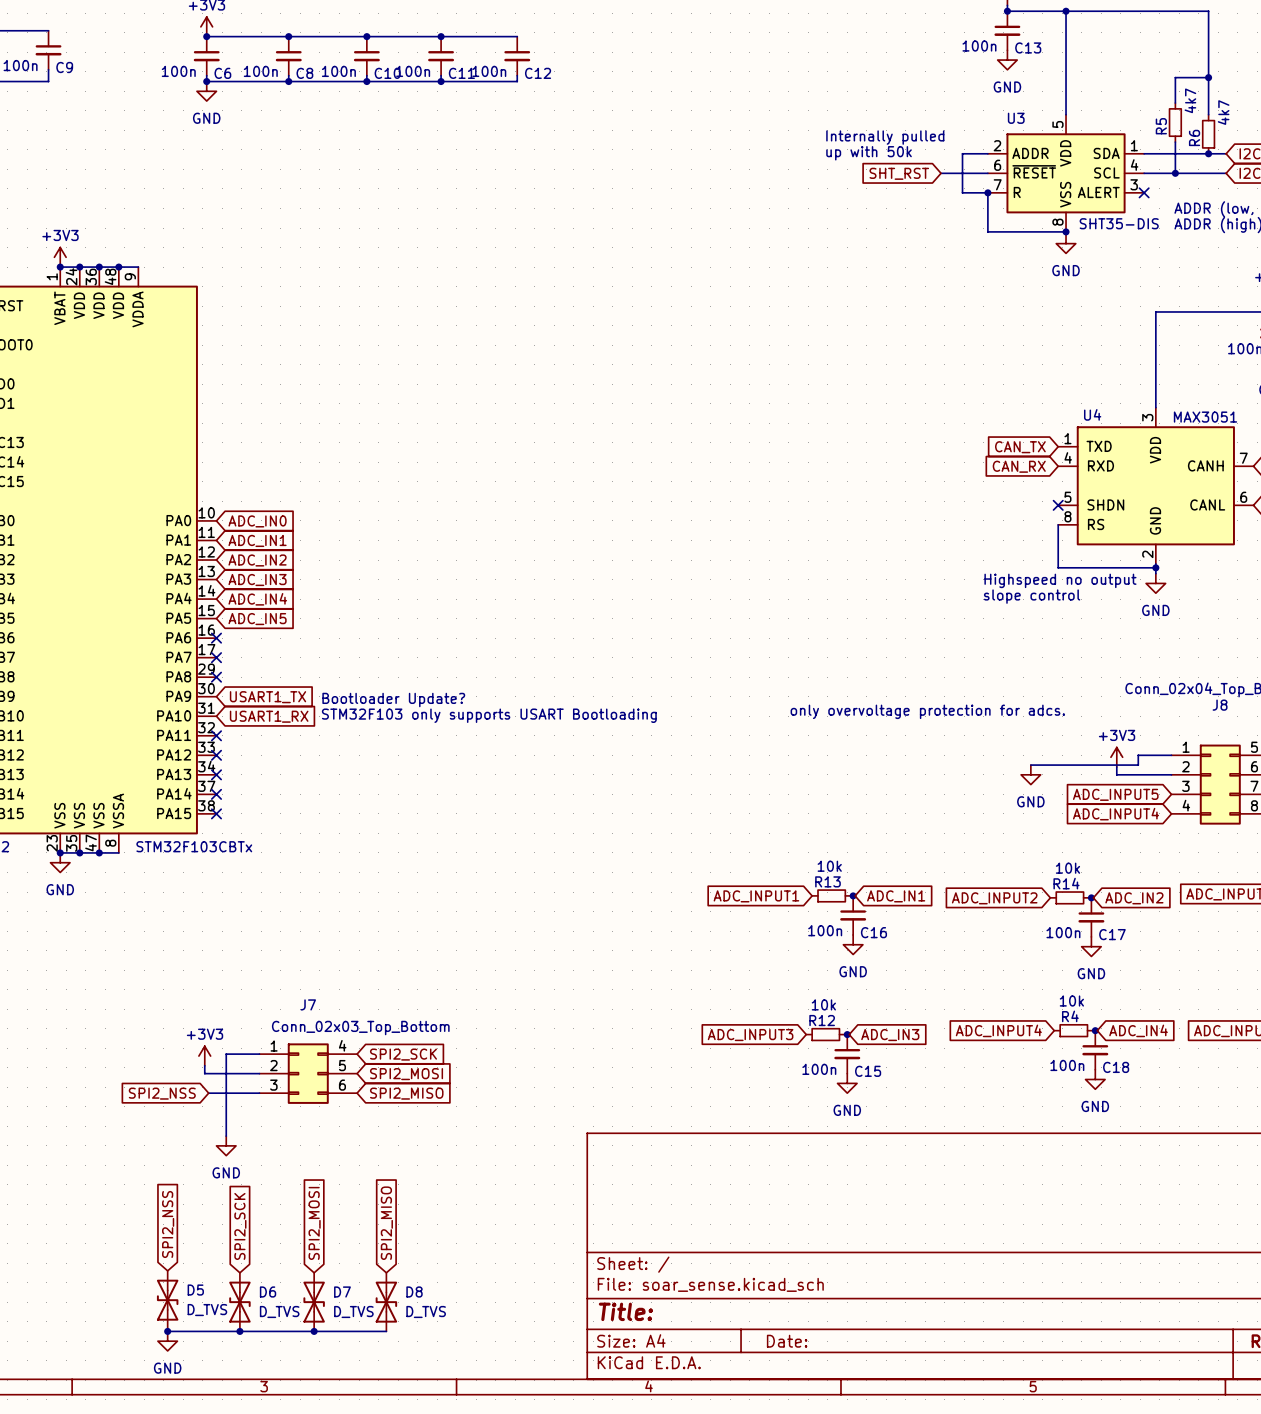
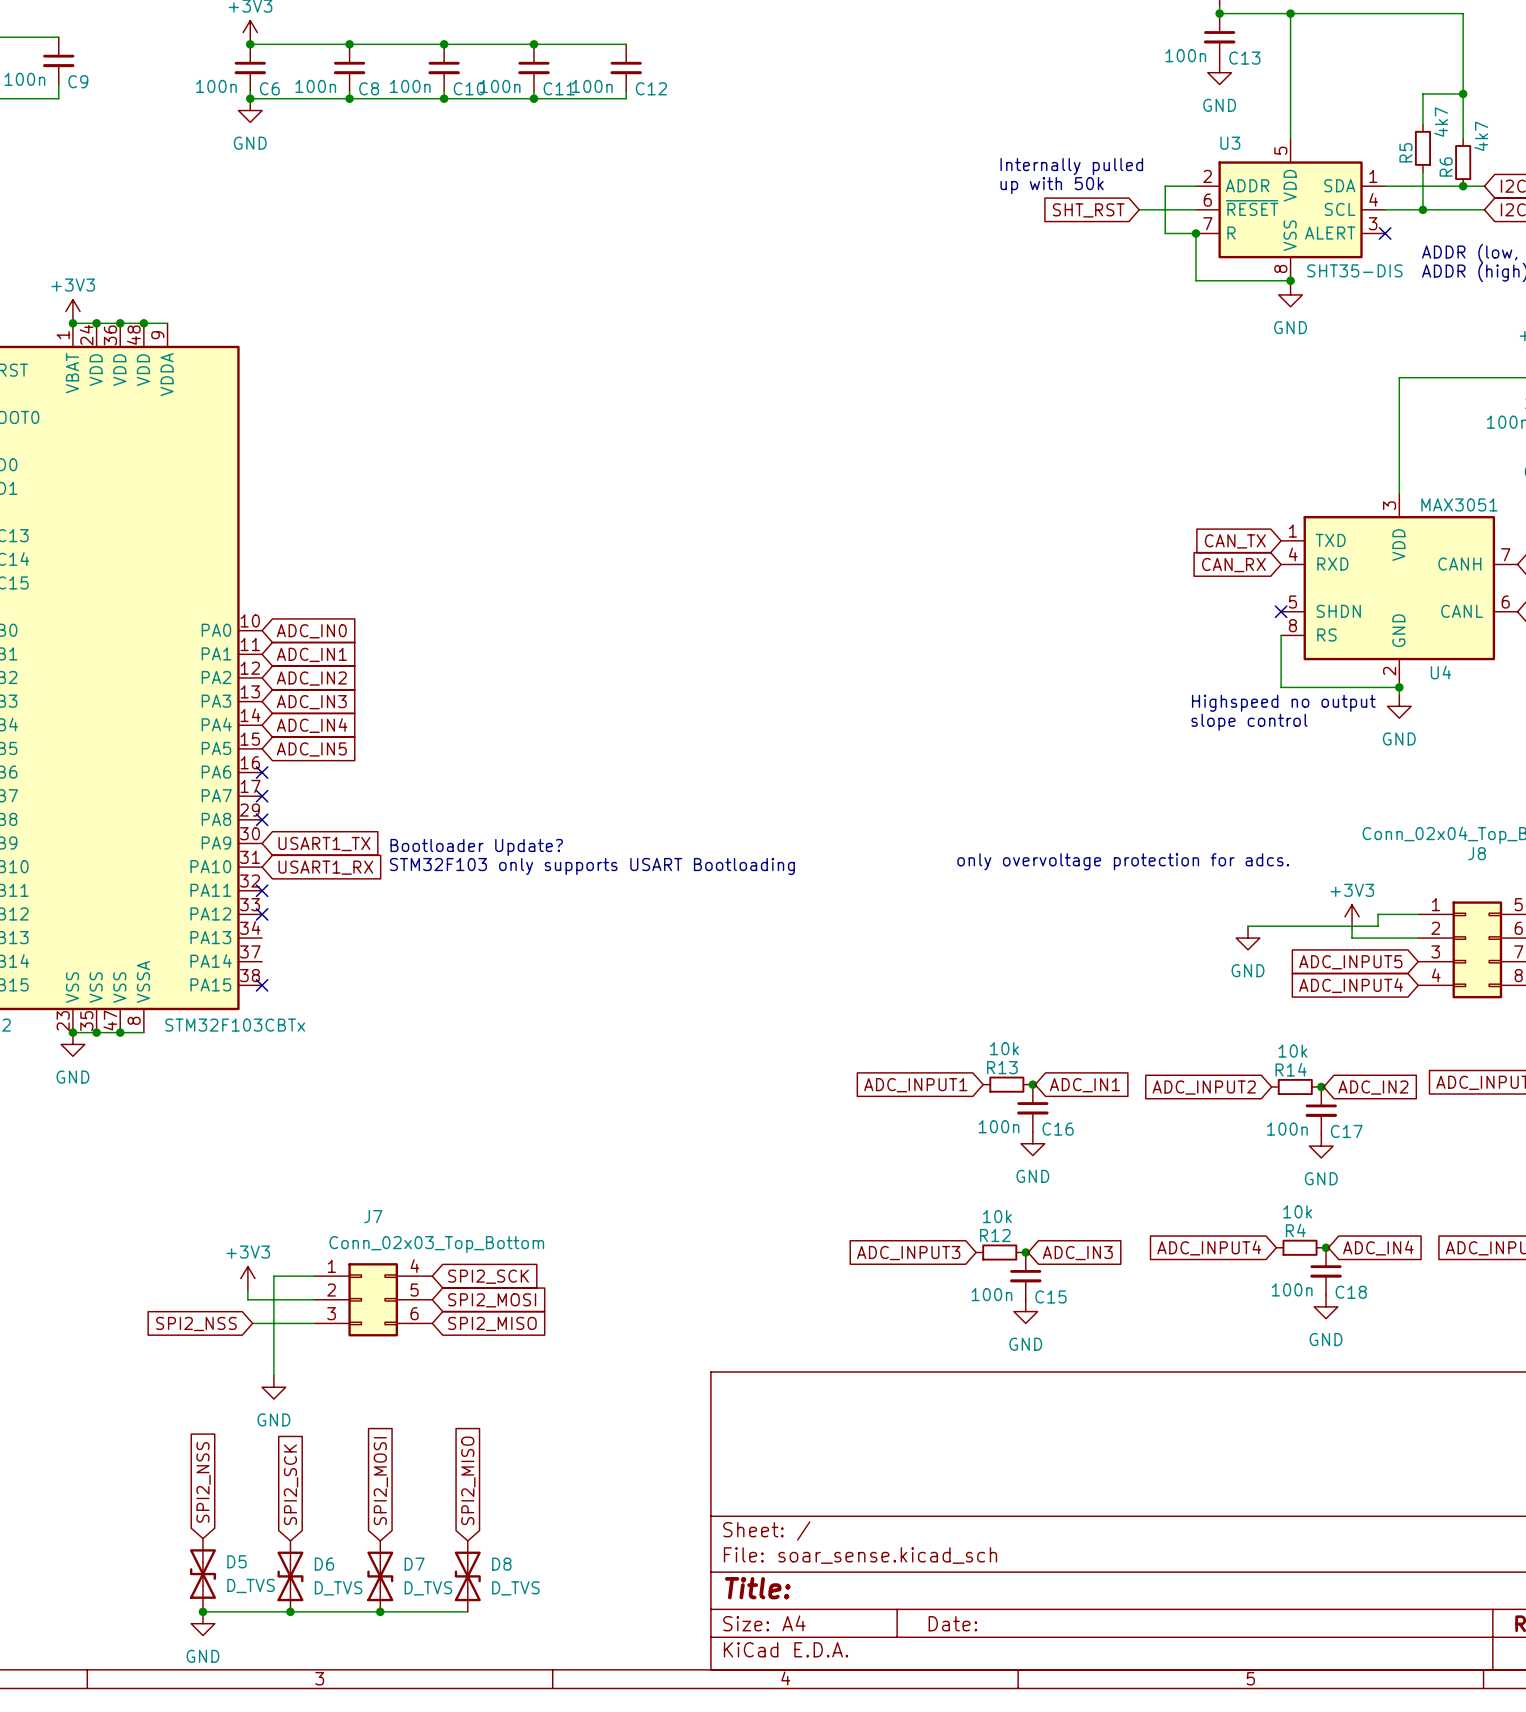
U4 name position: U4 (1092, 414) -> U4 (1441, 672)
no-connect mark: (216, 774) -> none
no-connect mark: (216, 794) -> none

